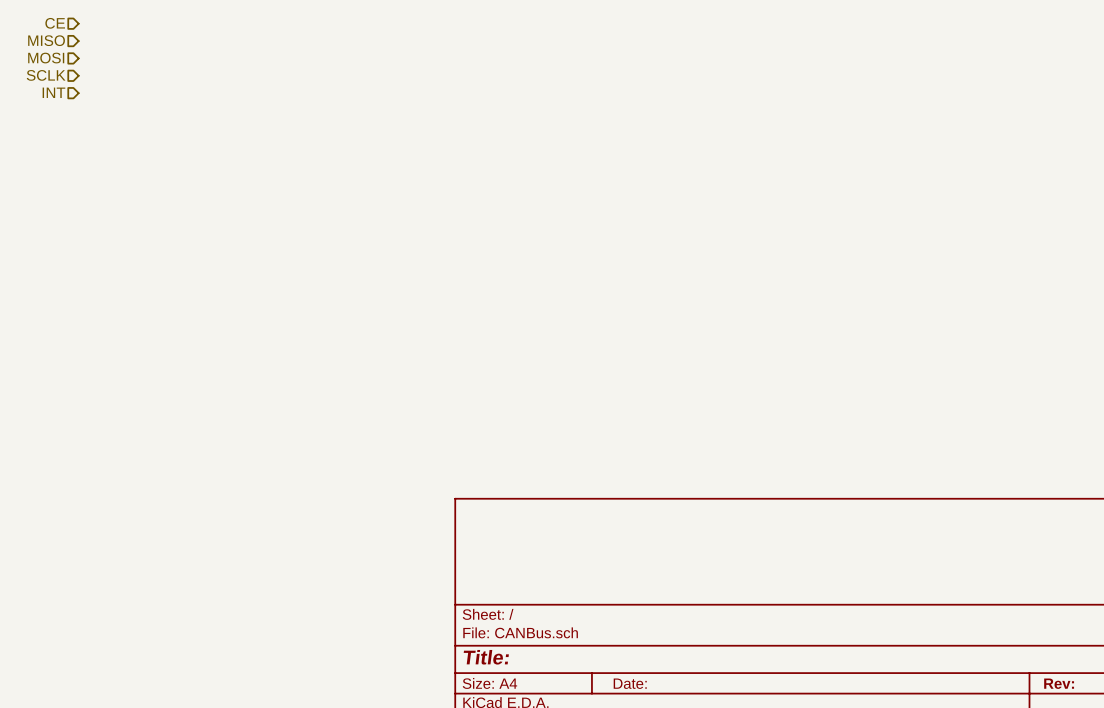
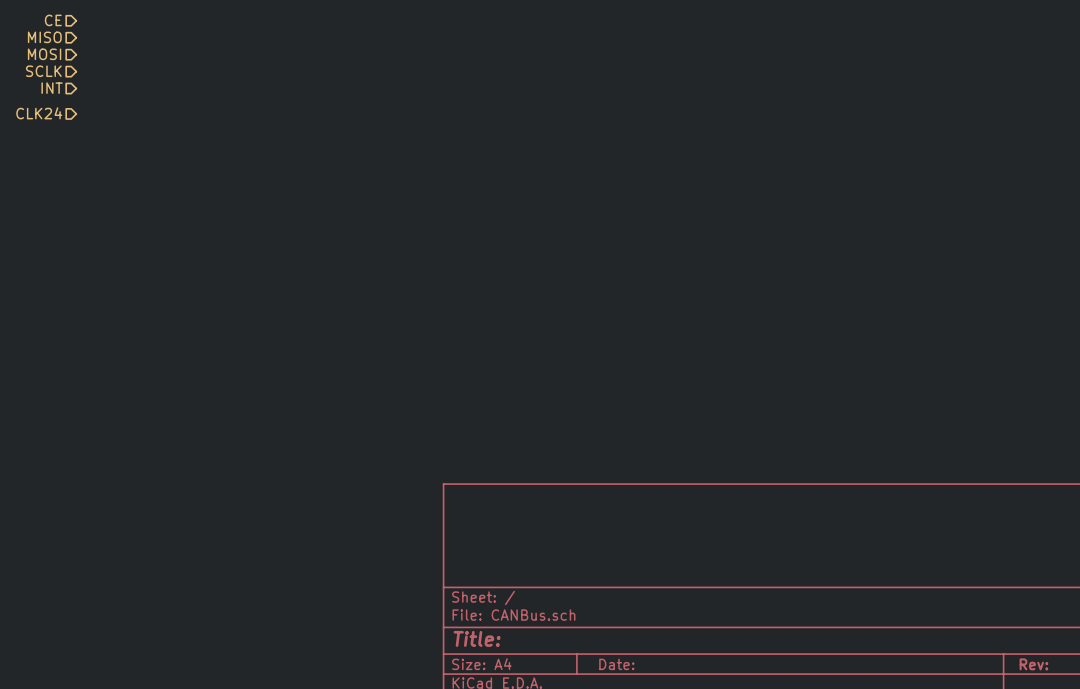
hierarchical label: none -> CLK24 (39, 113)

